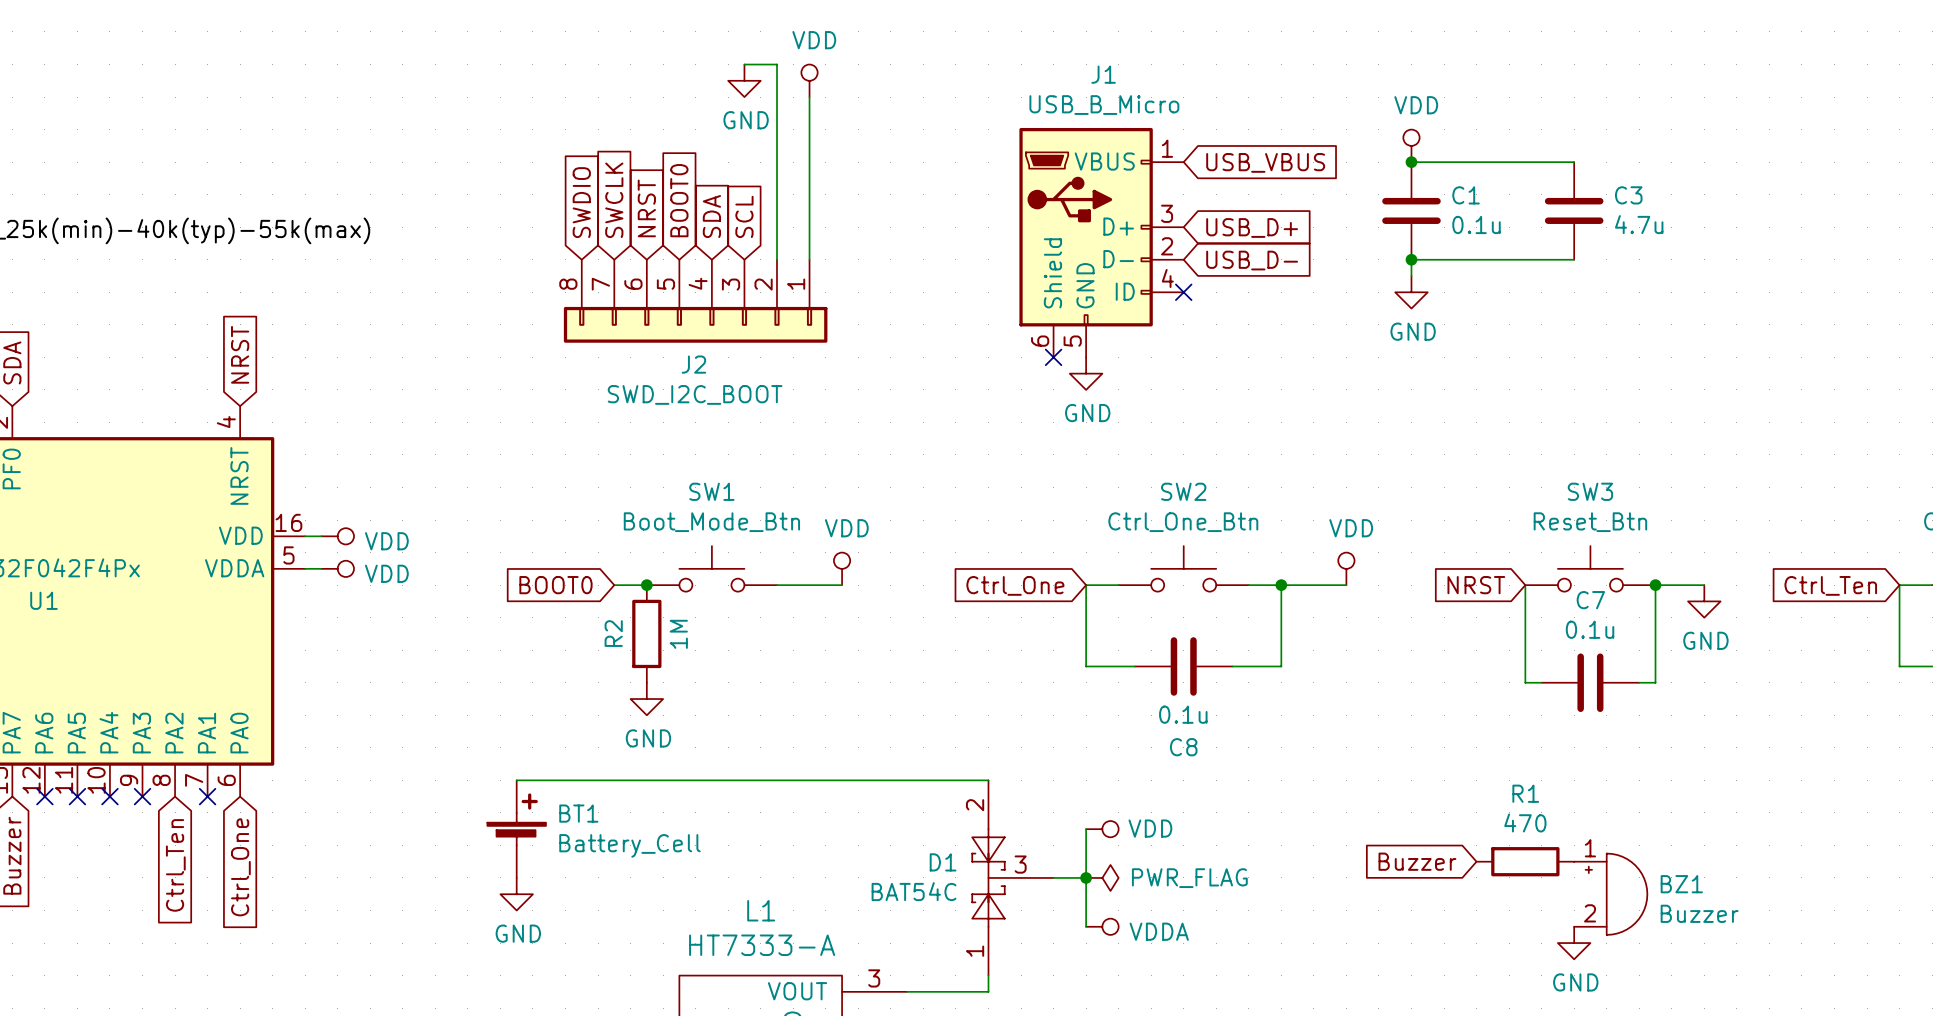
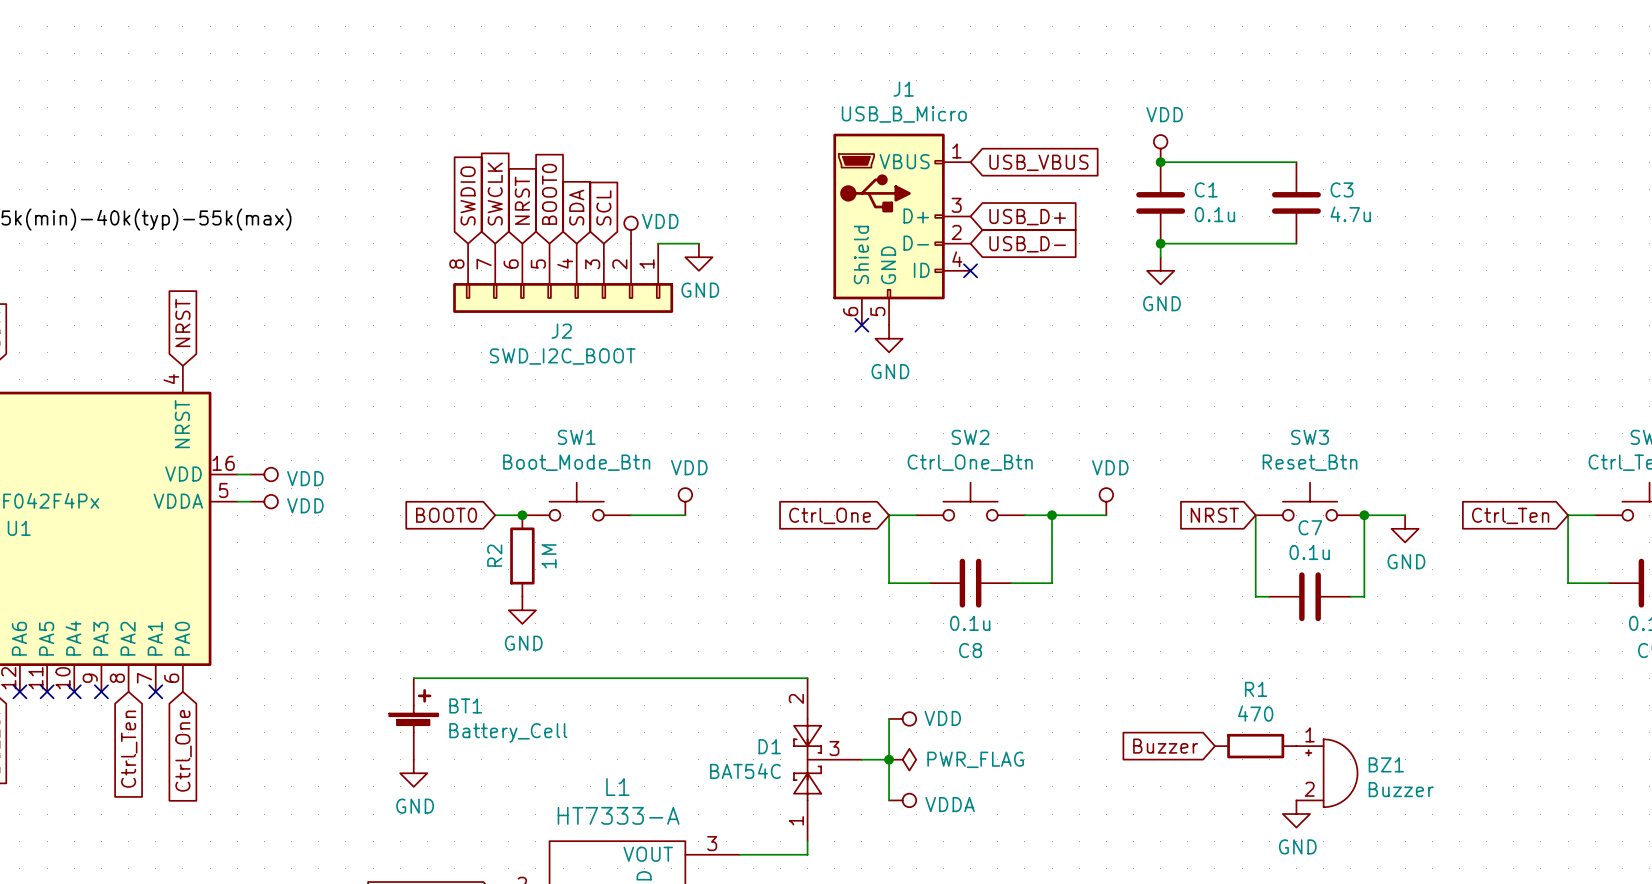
power symbol text position: VDD (814, 40) -> VDD (660, 221)
wire: (744, 64) (776, 64) (776, 259) -> none
power symbol position: GND (744, 80) -> GND (698, 257)
power symbol position: VDD (809, 80) -> VDD (631, 230)
wire: (809, 97) (809, 259) -> (698, 243) (658, 243)

